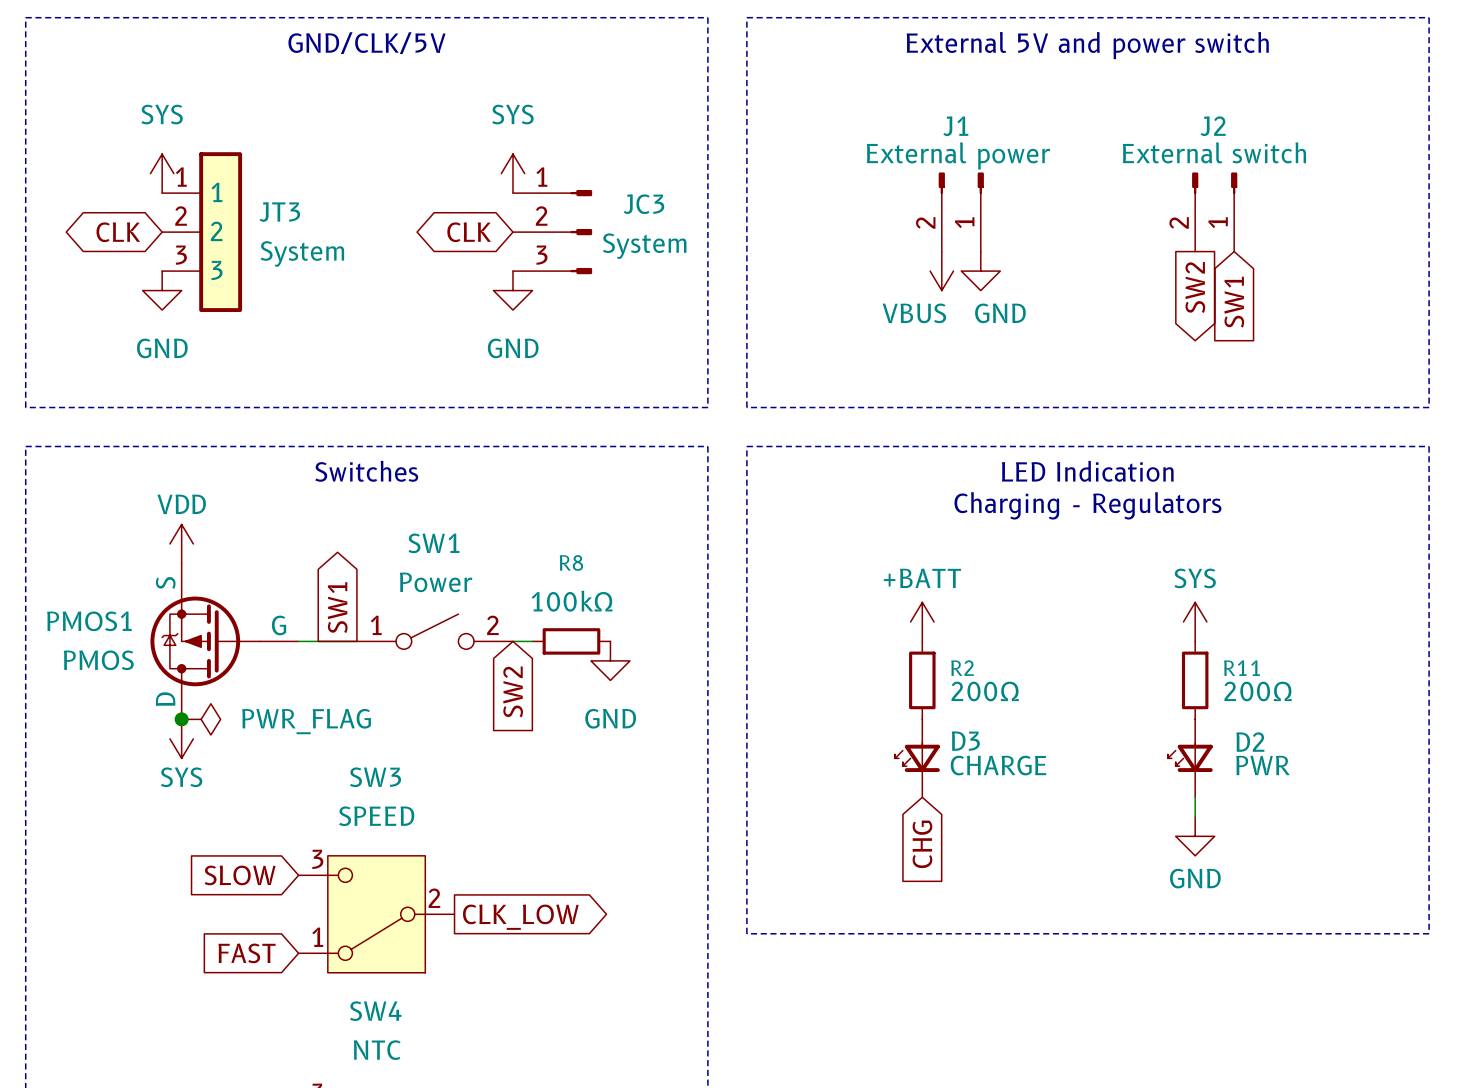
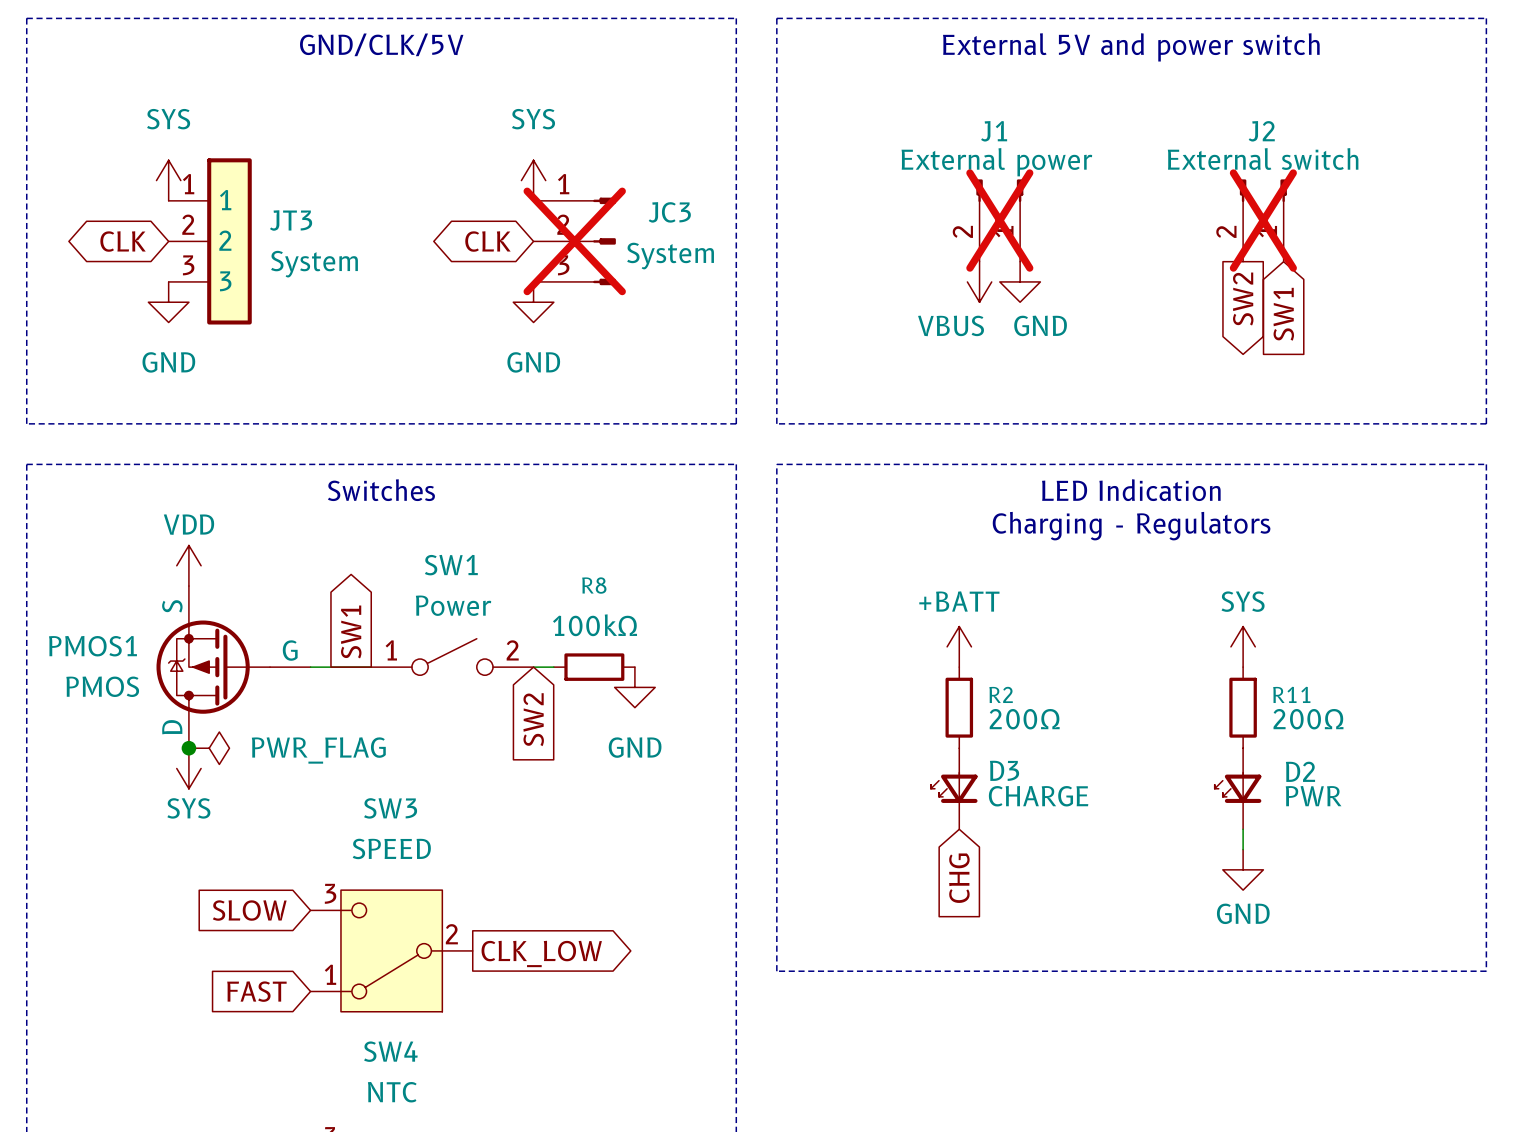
J1 do-not-place cross: none -> (999, 220)
J2 do-not-place cross: none -> (1263, 220)
JC3 do-not-place cross: none -> (574, 241)

